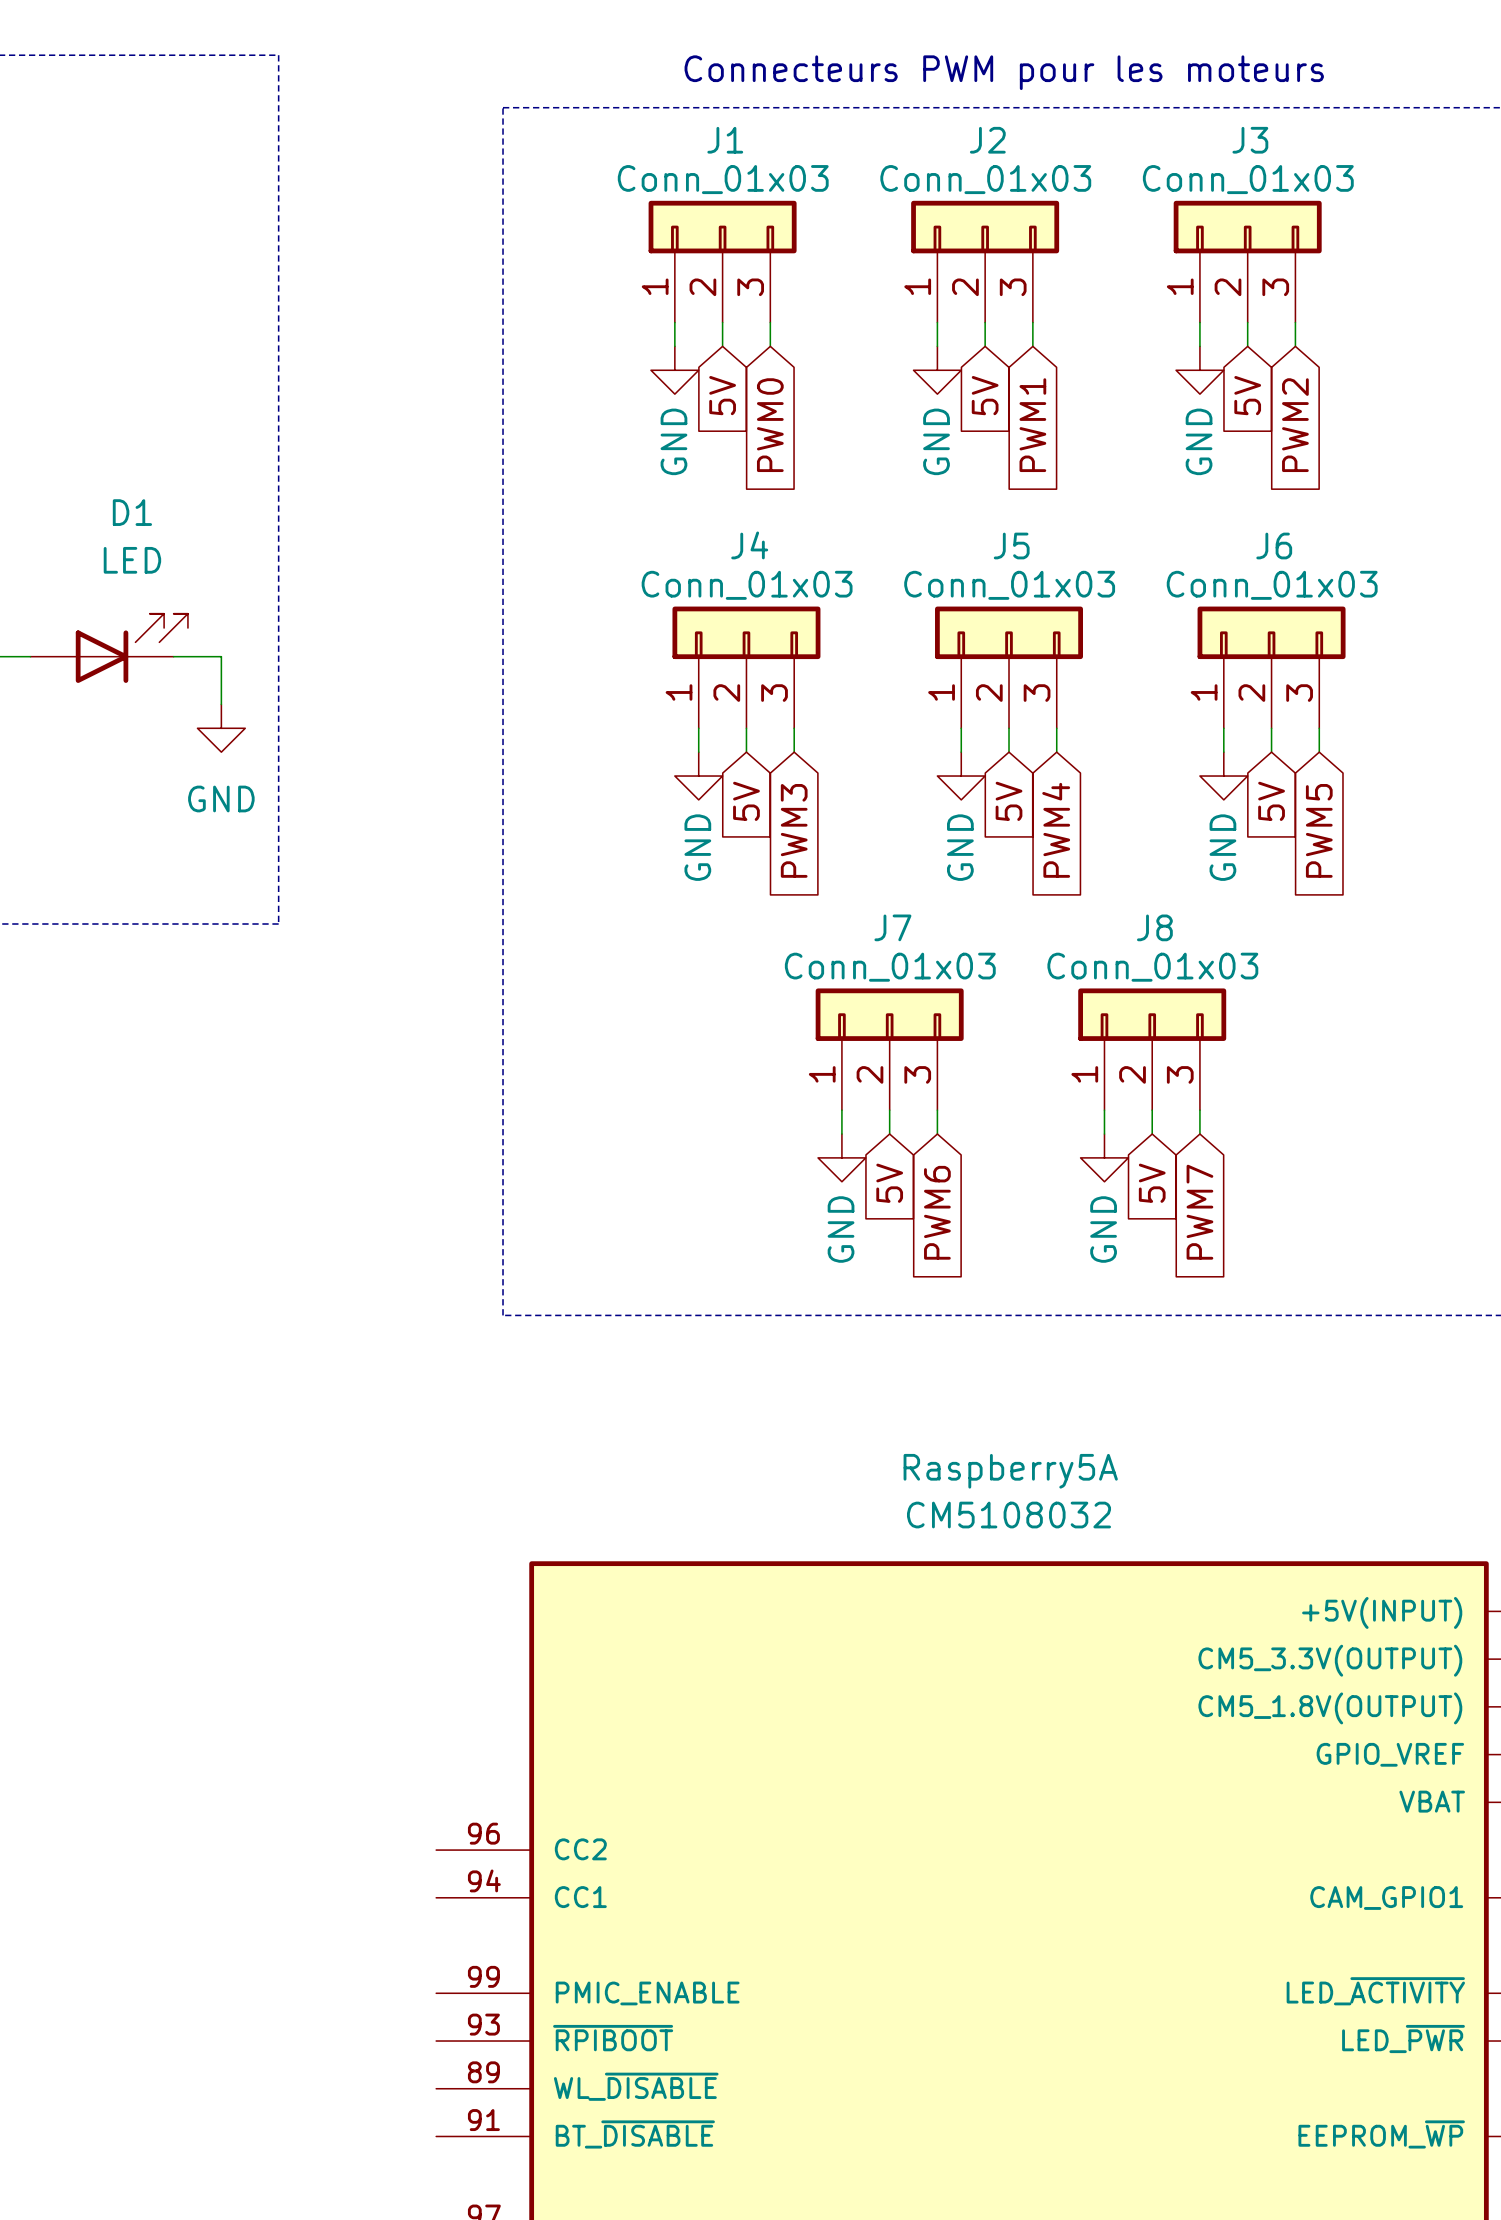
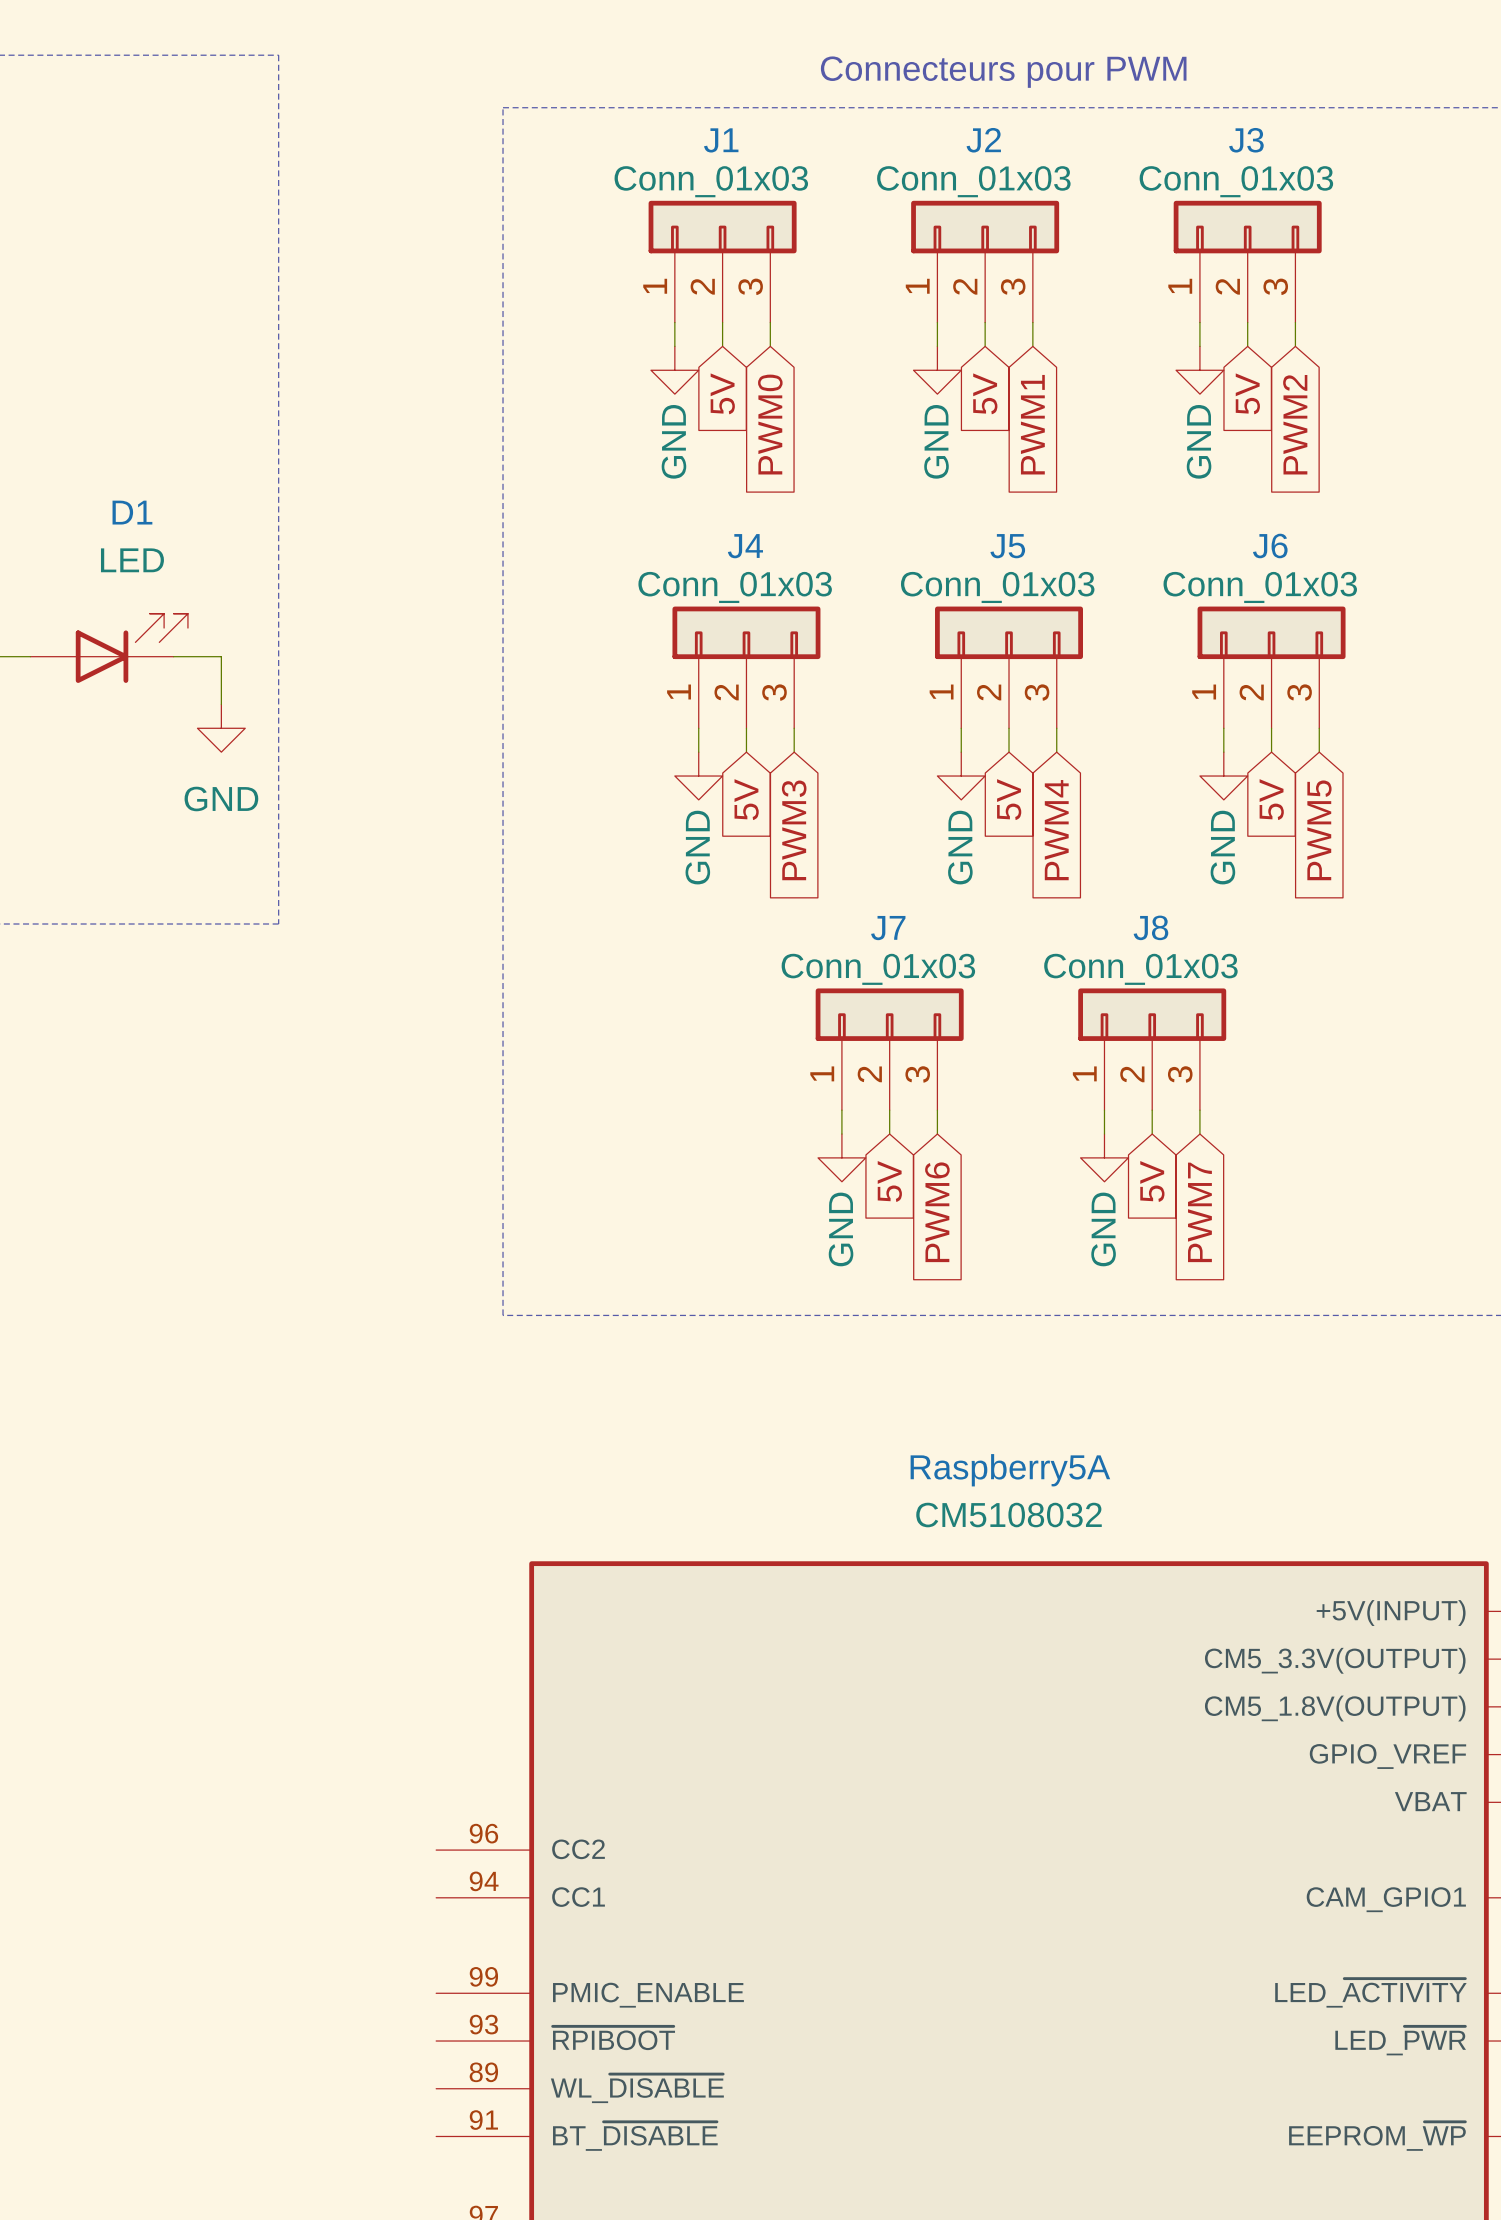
text: Connecteurs PWM pour les moteurs (1004, 72) -> Connecteurs pour PWM (1003, 72)

